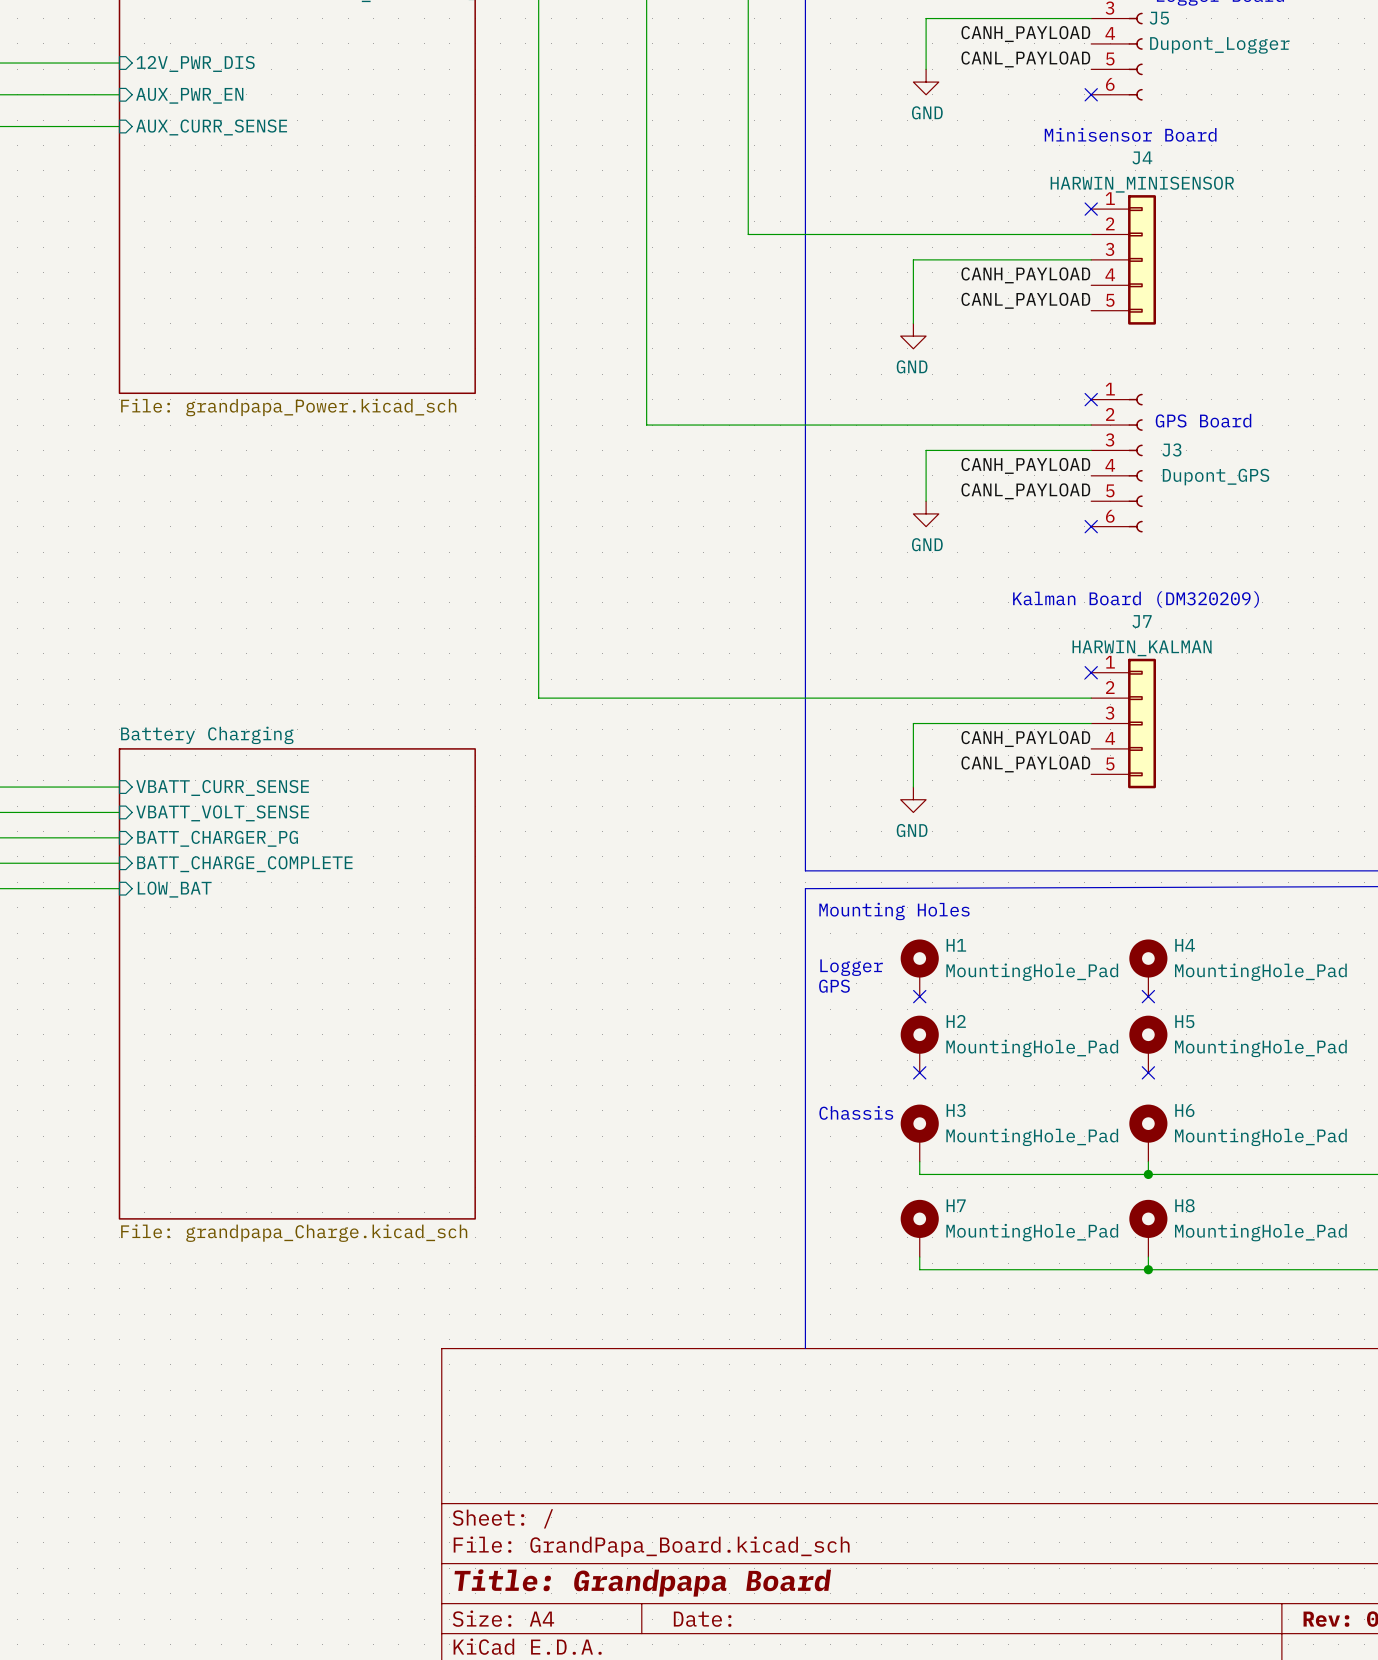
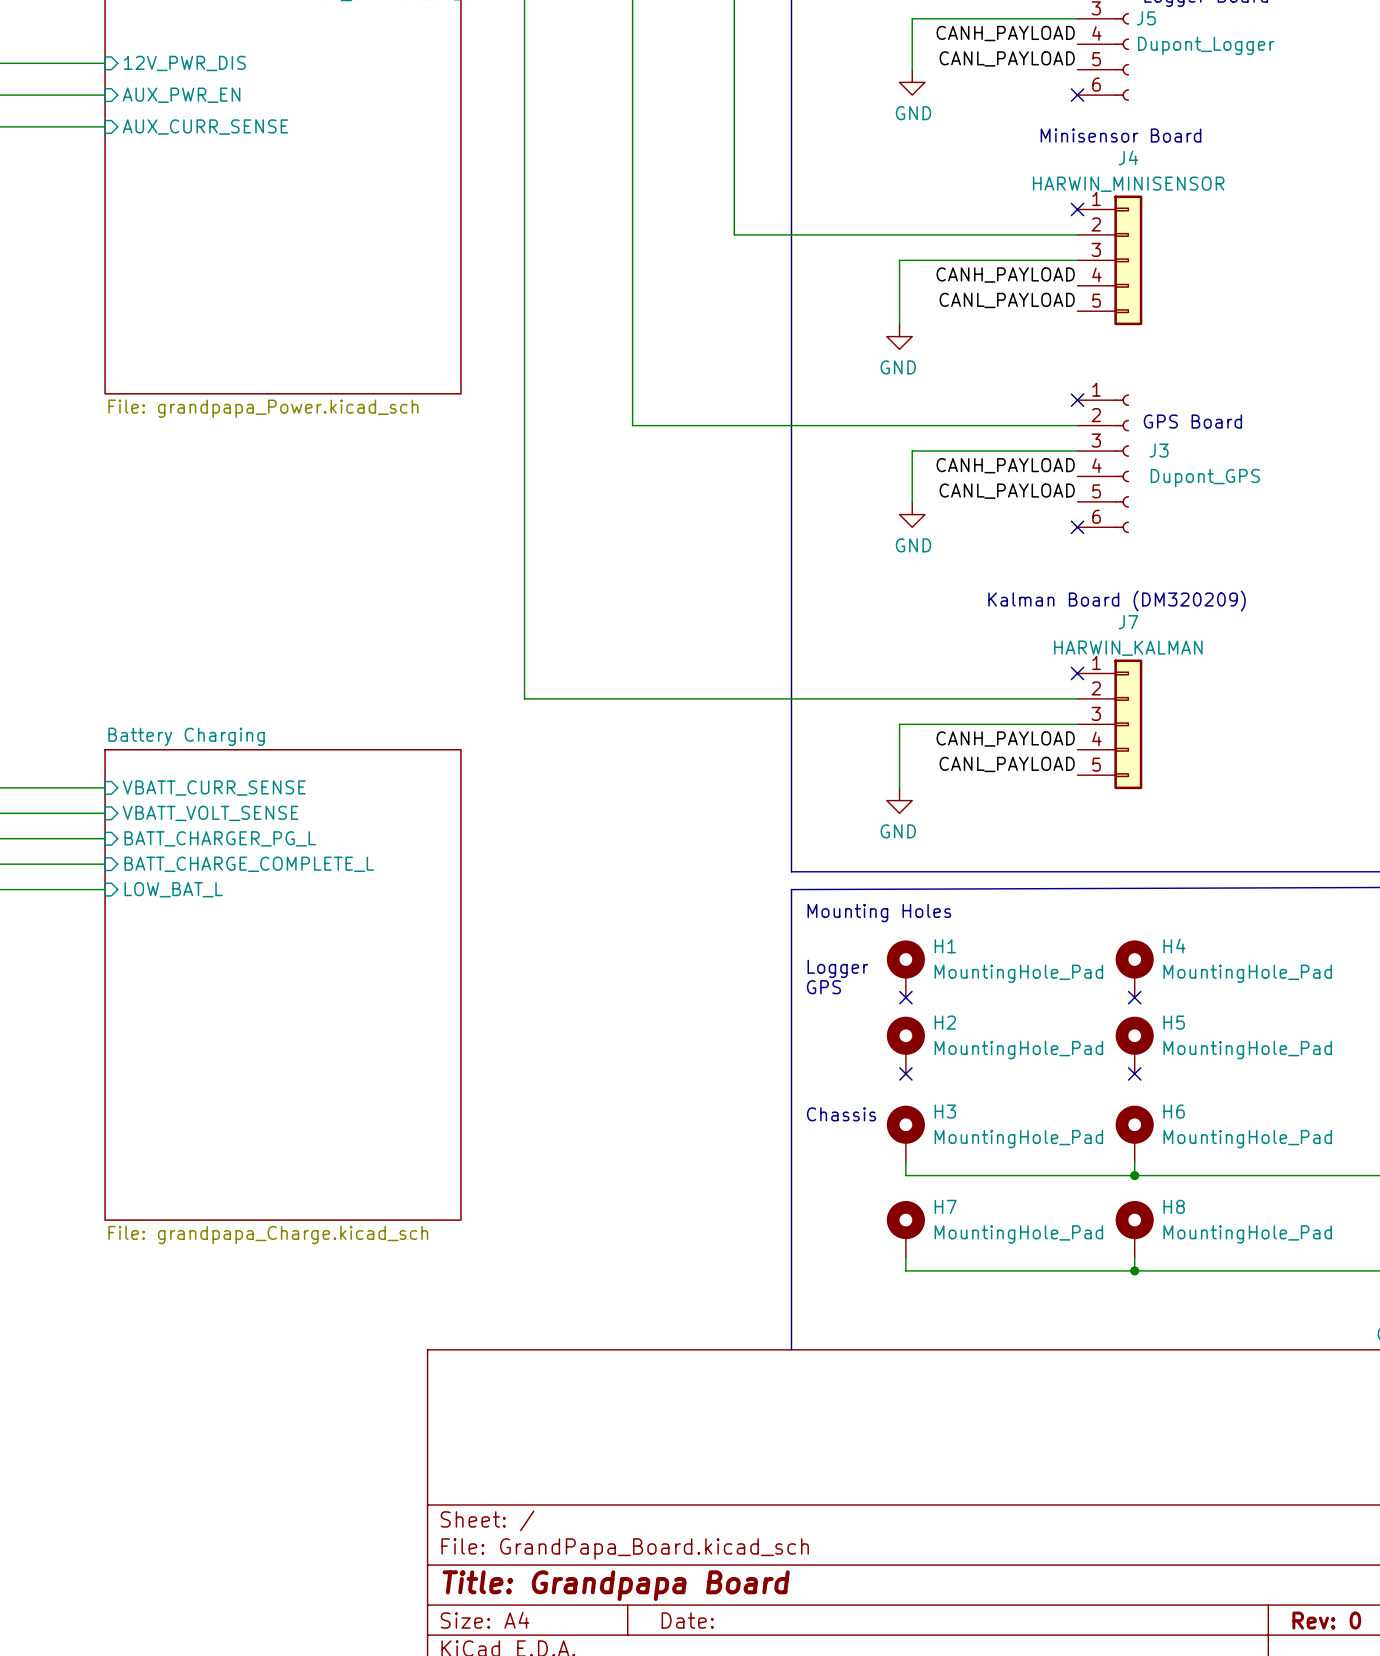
sheet pin: BATT_CHARGER_PG (217, 838) -> BATT_CHARGER_PG_L (220, 838)
sheet pin: BATT_CHARGE_COMPLETE (244, 864) -> BATT_CHARGE_COMPLETE_L (249, 864)
sheet pin: LOW_BAT (174, 889) -> LOW_BAT_L (173, 889)

